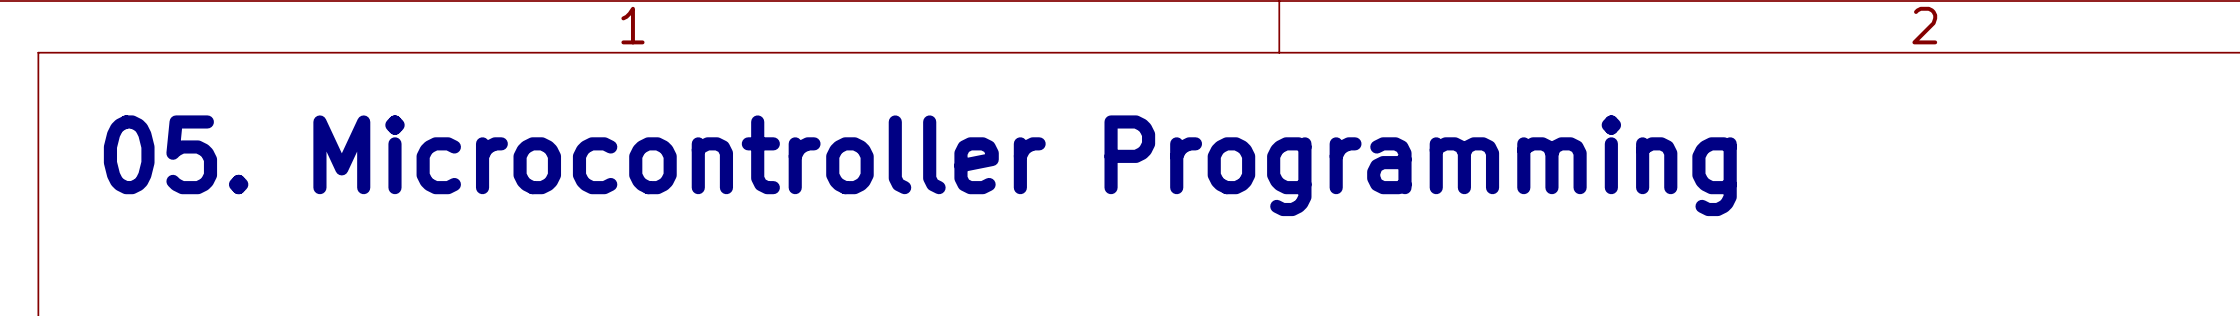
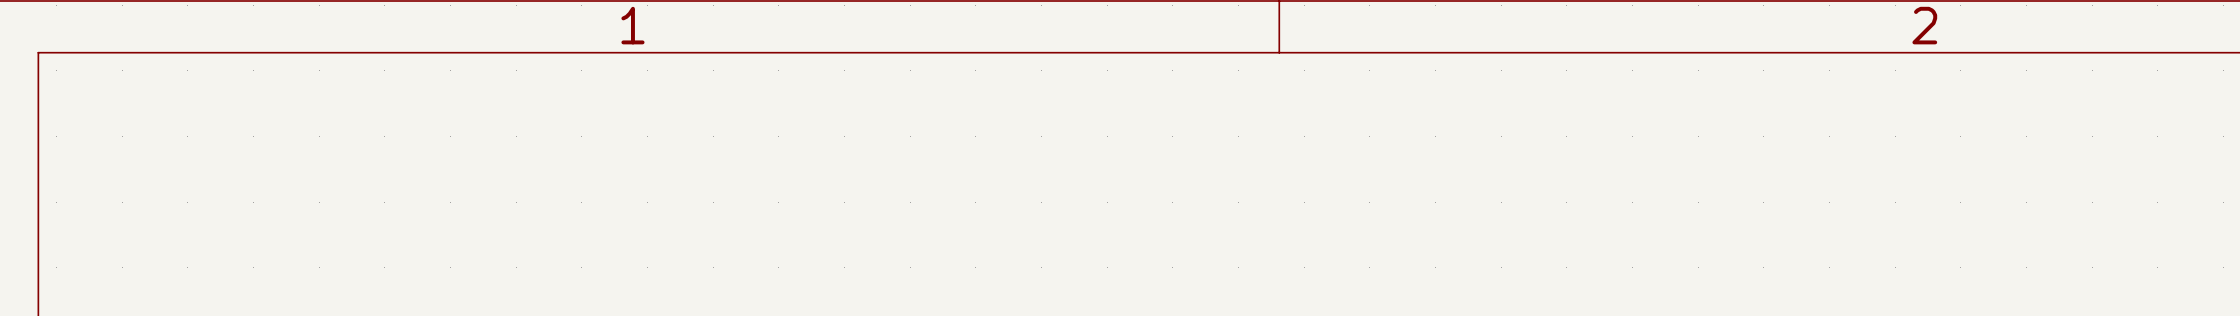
text: 05. Microcontroller Programming (920, 165) -> none

